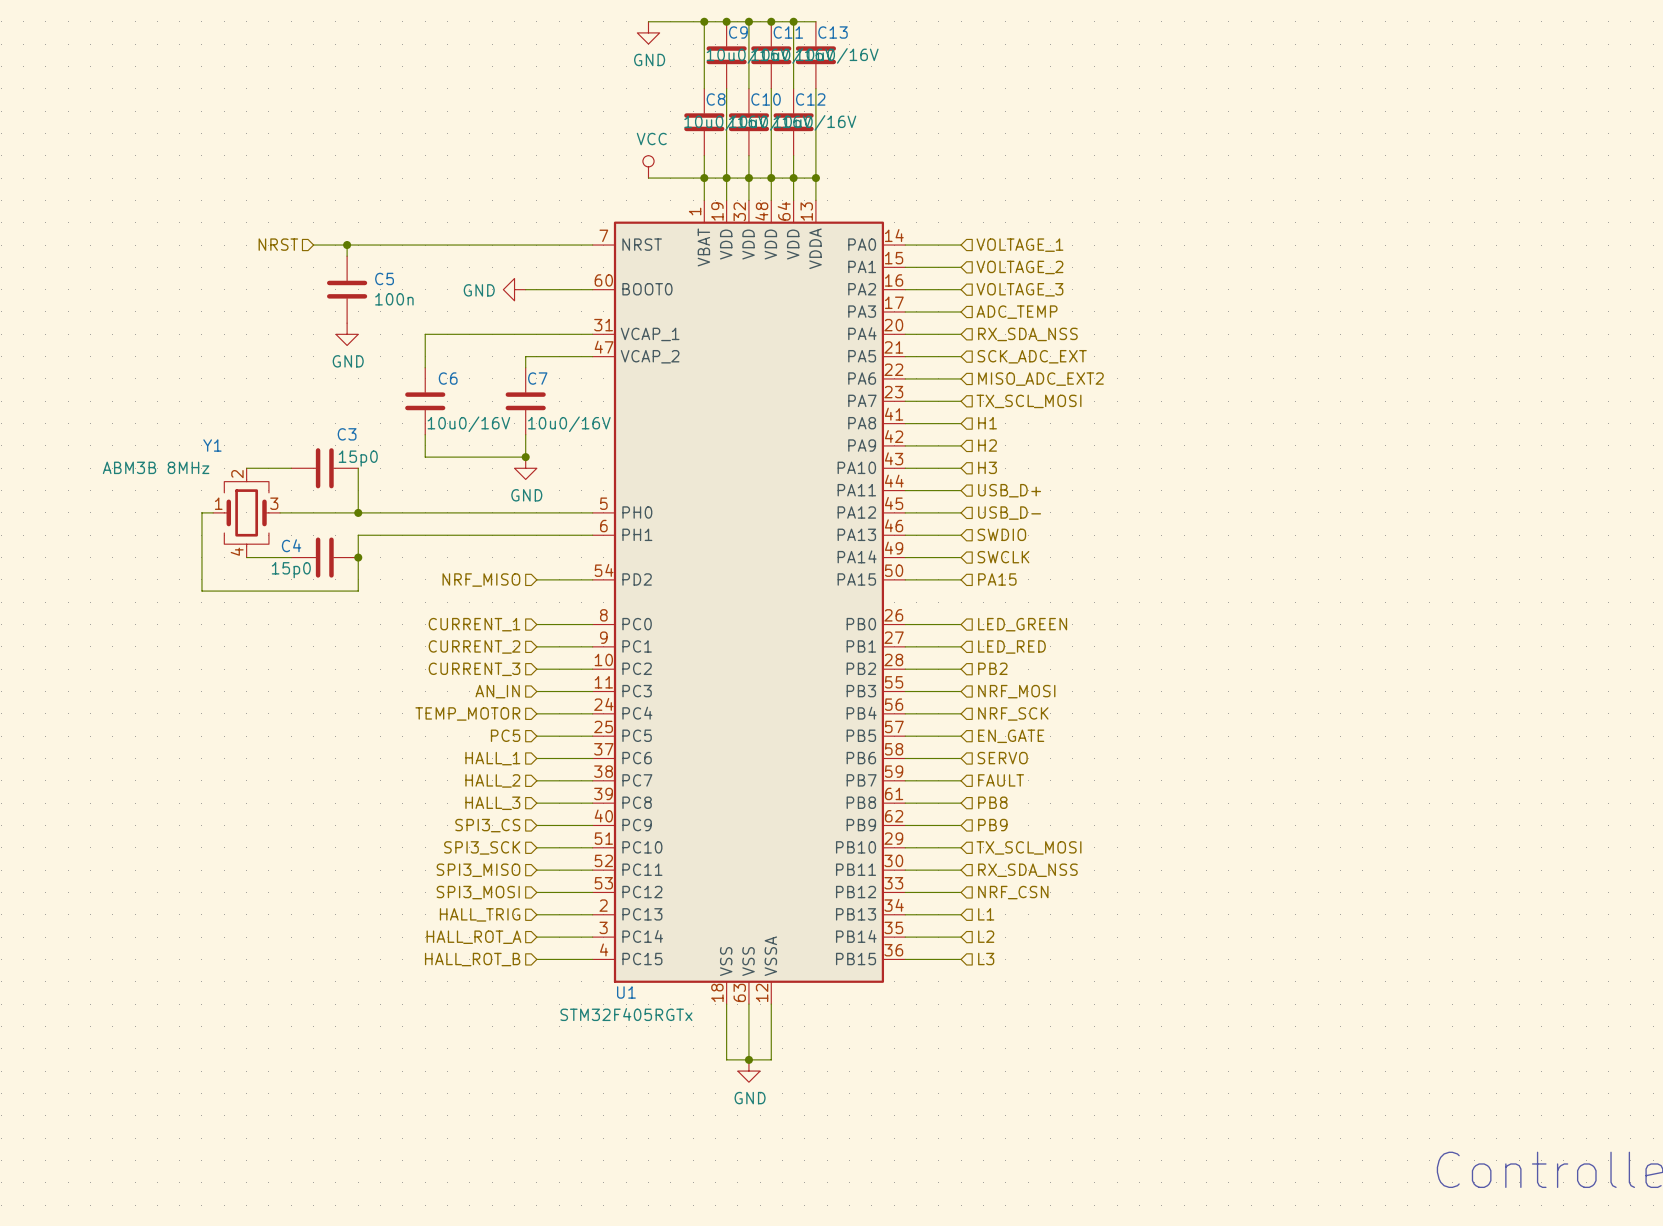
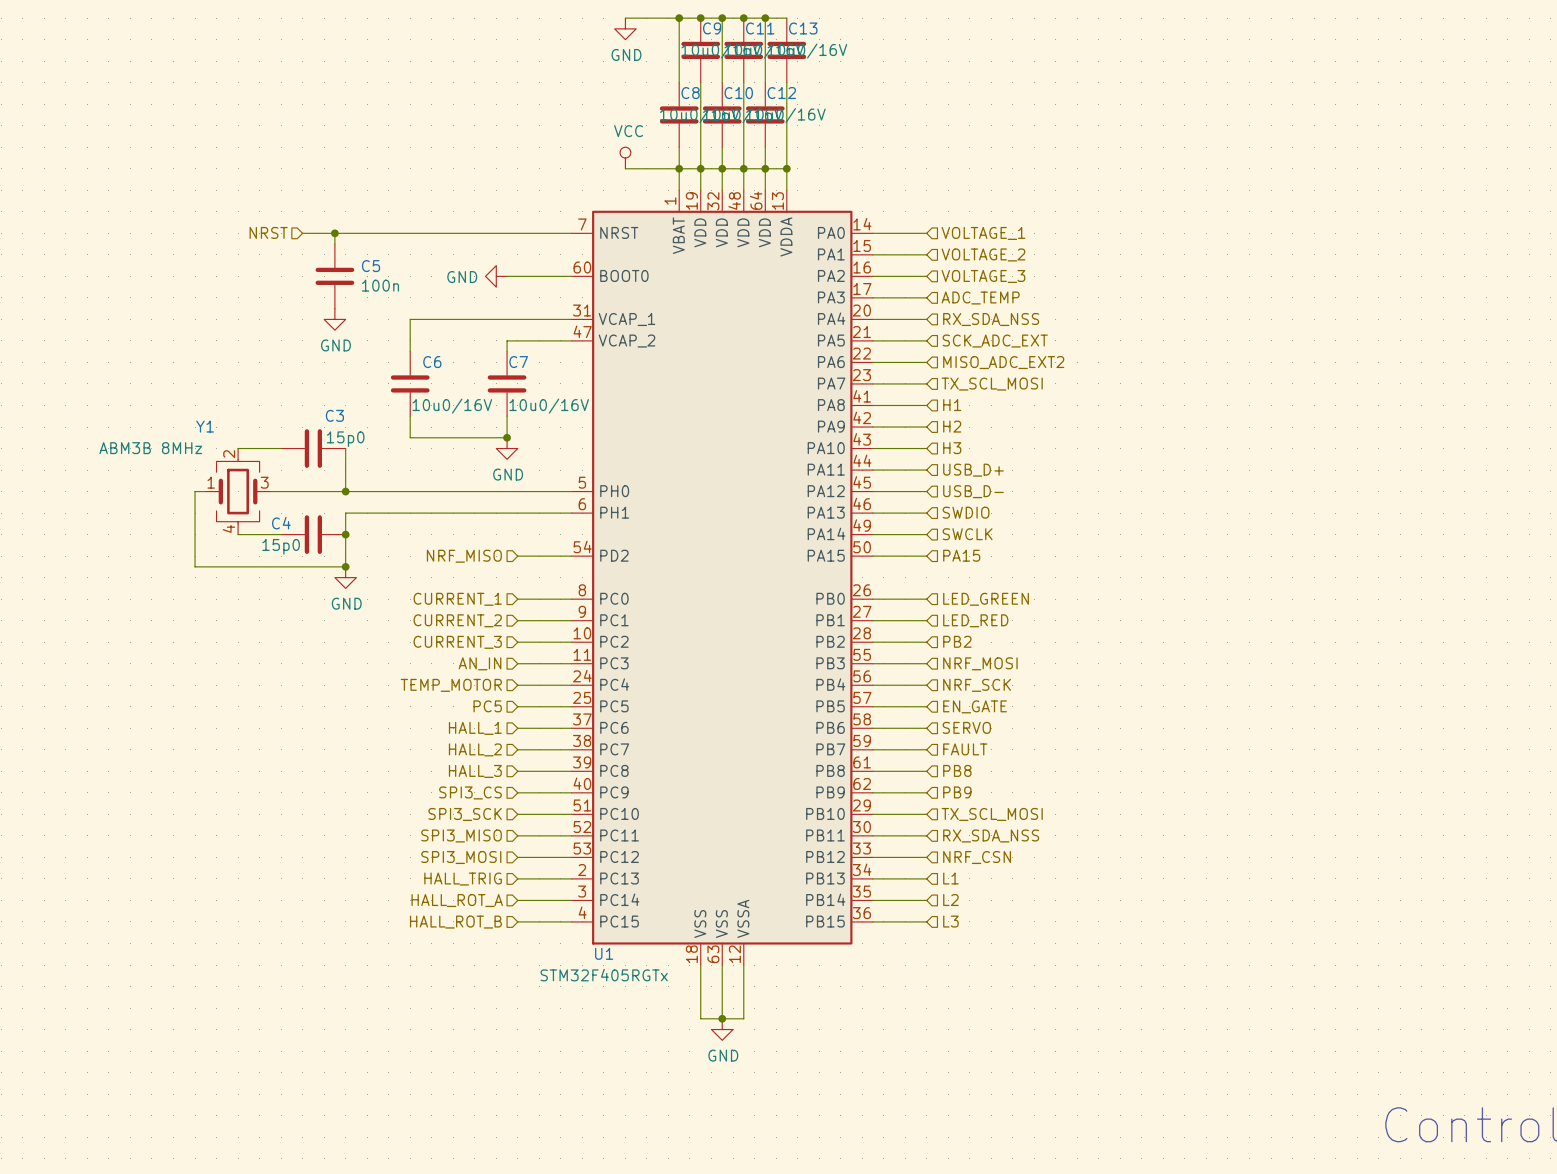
junction: none -> (345, 566)
power symbol: none -> GND (345, 577)

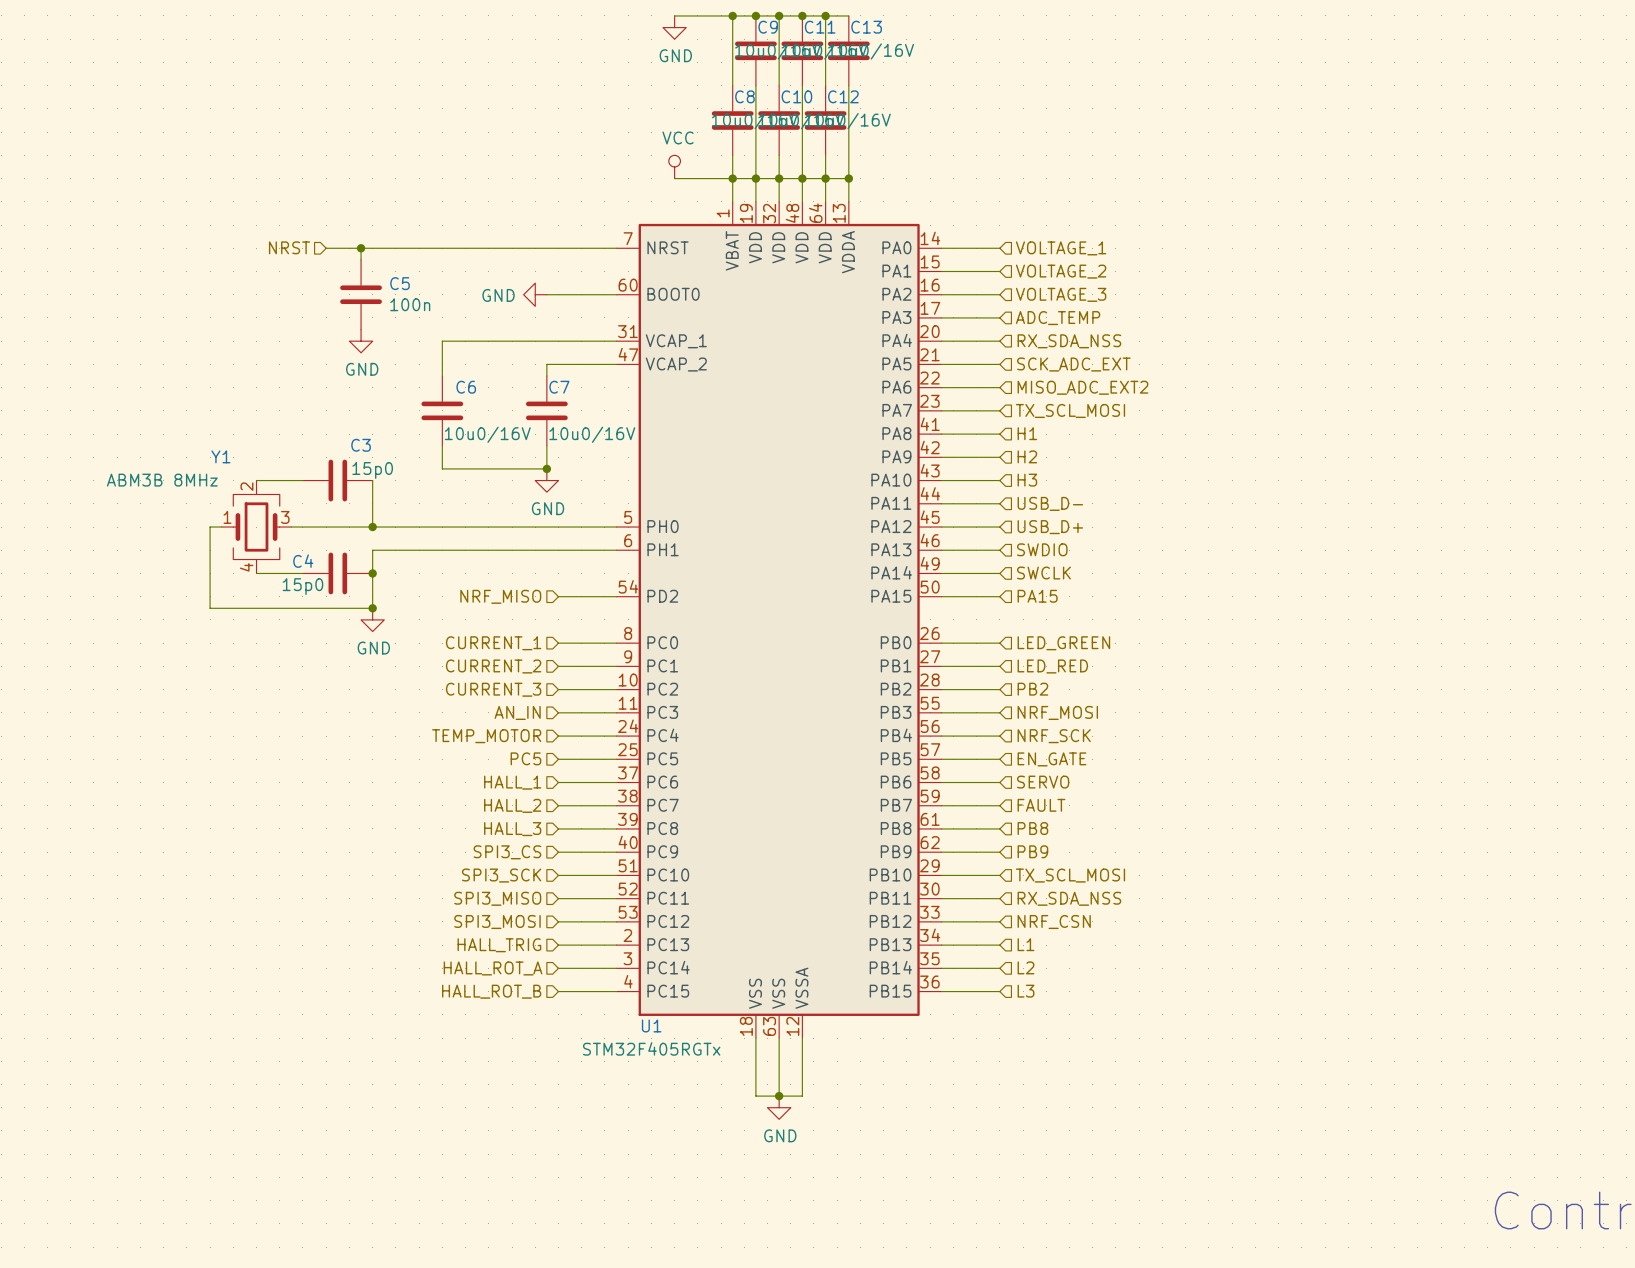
hierarchical label: USB_D+ (973, 470) -> USB_D- (1050, 503)
hierarchical label: USB_D- (973, 491) -> USB_D+ (1050, 527)

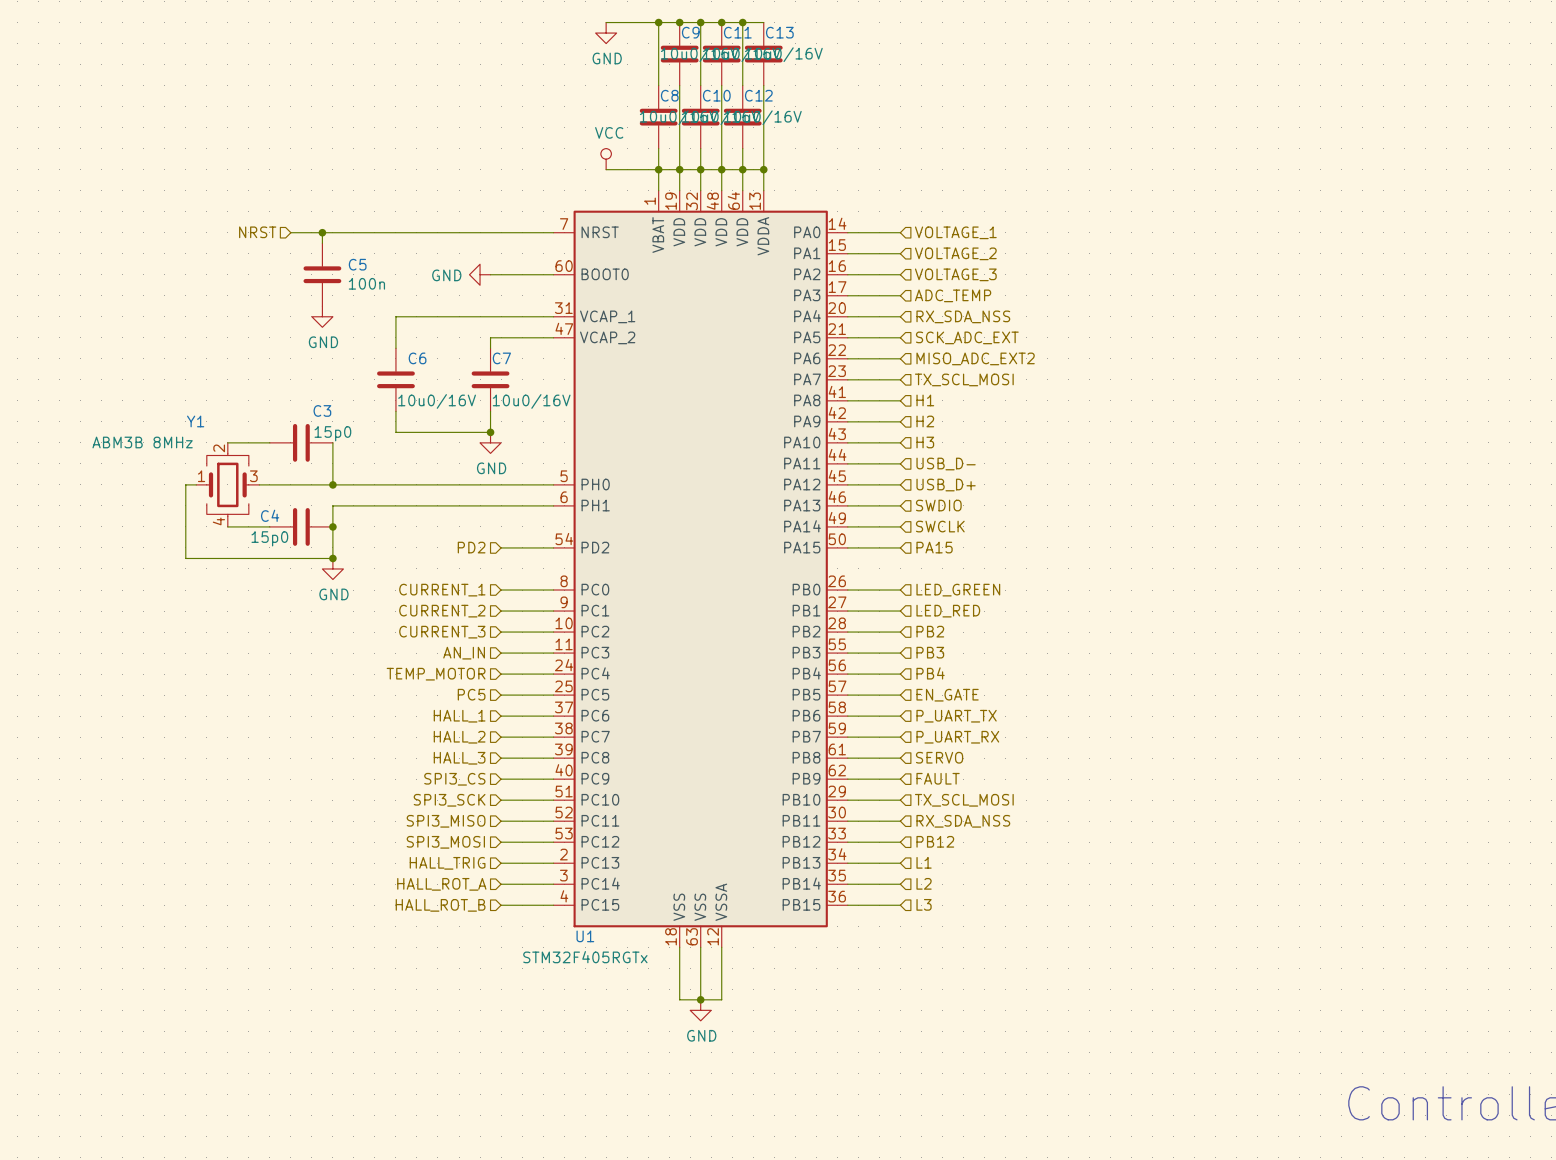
hierarchical label: NRF_MISO (500, 596) -> PD2 (471, 547)
hierarchical label: NRF_MOSI (1057, 712) -> PB3 (930, 652)
hierarchical label: NRF_SCK (1054, 736) -> PB4 (930, 673)
hierarchical label: SERVO (1043, 782) -> P_UART_TX (956, 716)
hierarchical label: FAULT (1041, 805) -> P_UART_RX (957, 737)
hierarchical label: PB8 (1032, 828) -> SERVO (939, 757)
hierarchical label: PB9 (1032, 851) -> FAULT (938, 778)
hierarchical label: NRF_CSN (1054, 922) -> PB12 (935, 841)

